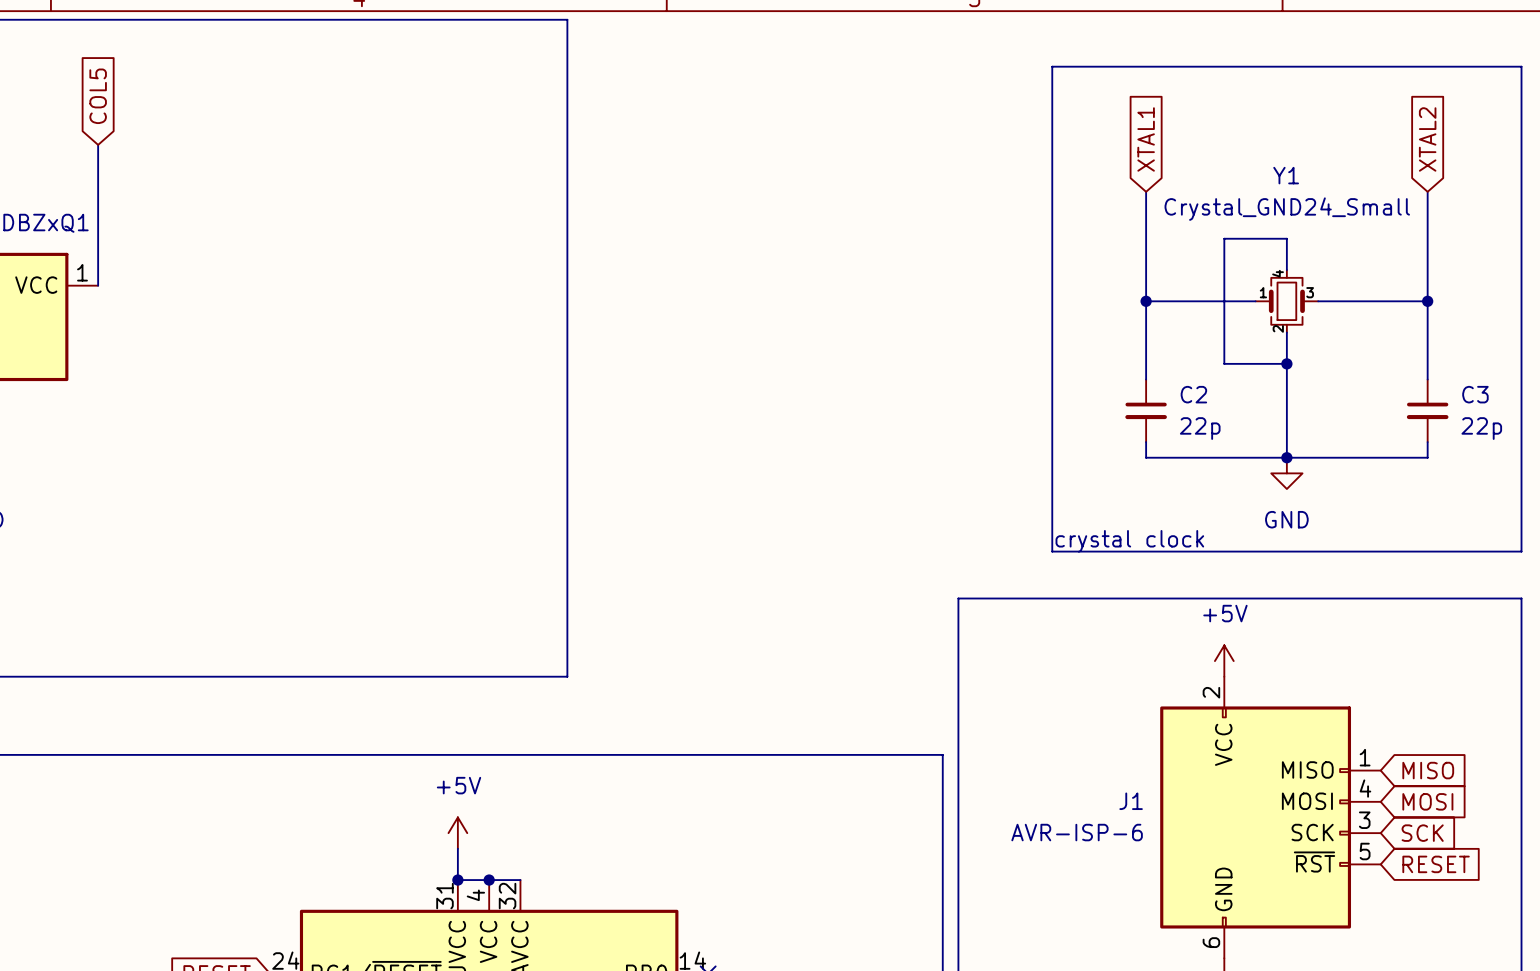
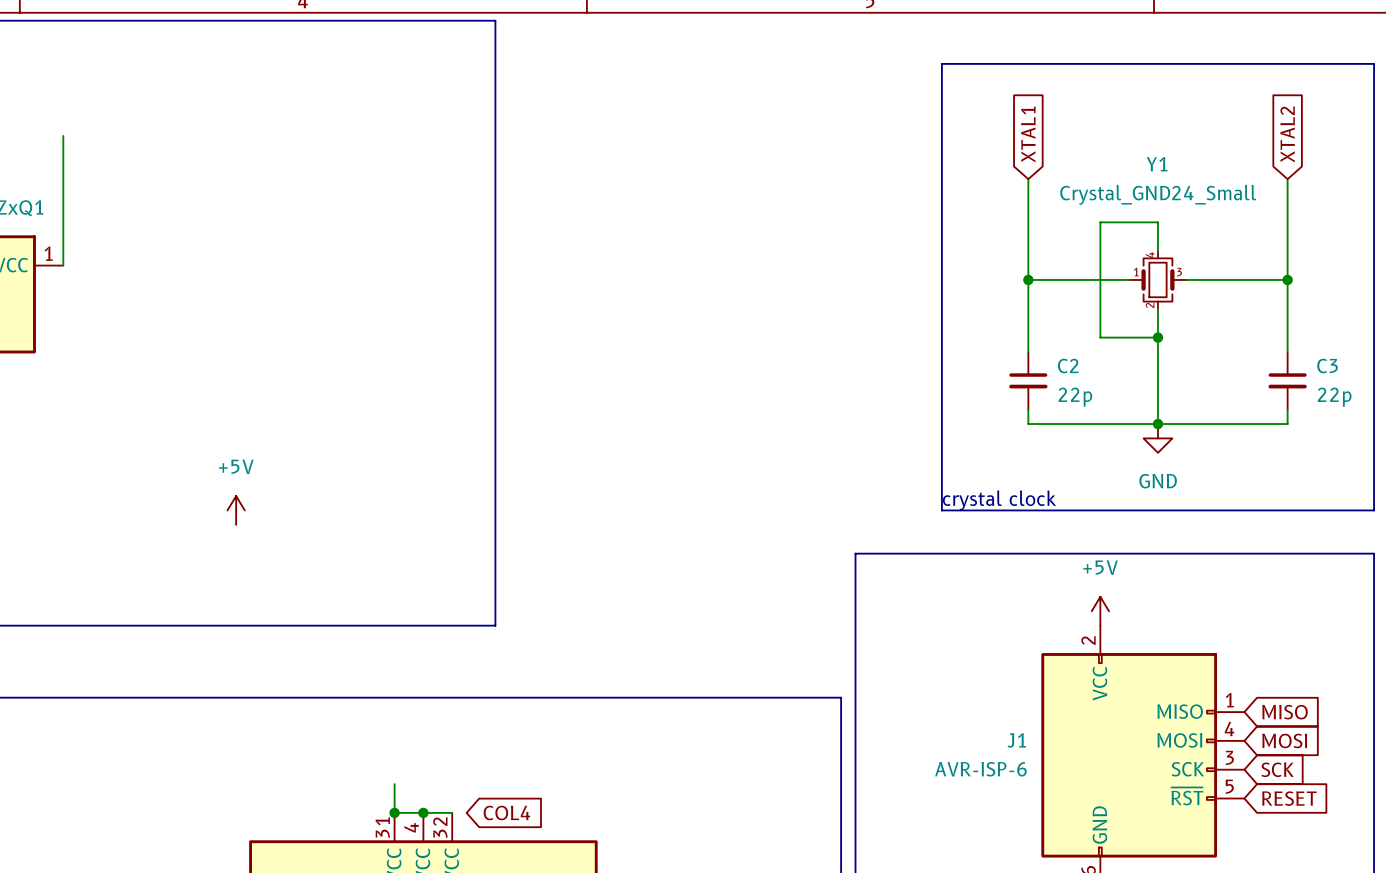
global label: COL5 (98, 96) -> none
power symbol: none -> +5V (236, 510)
power symbol: +5V (457, 833) -> none
global label: none -> COL4 (506, 812)

